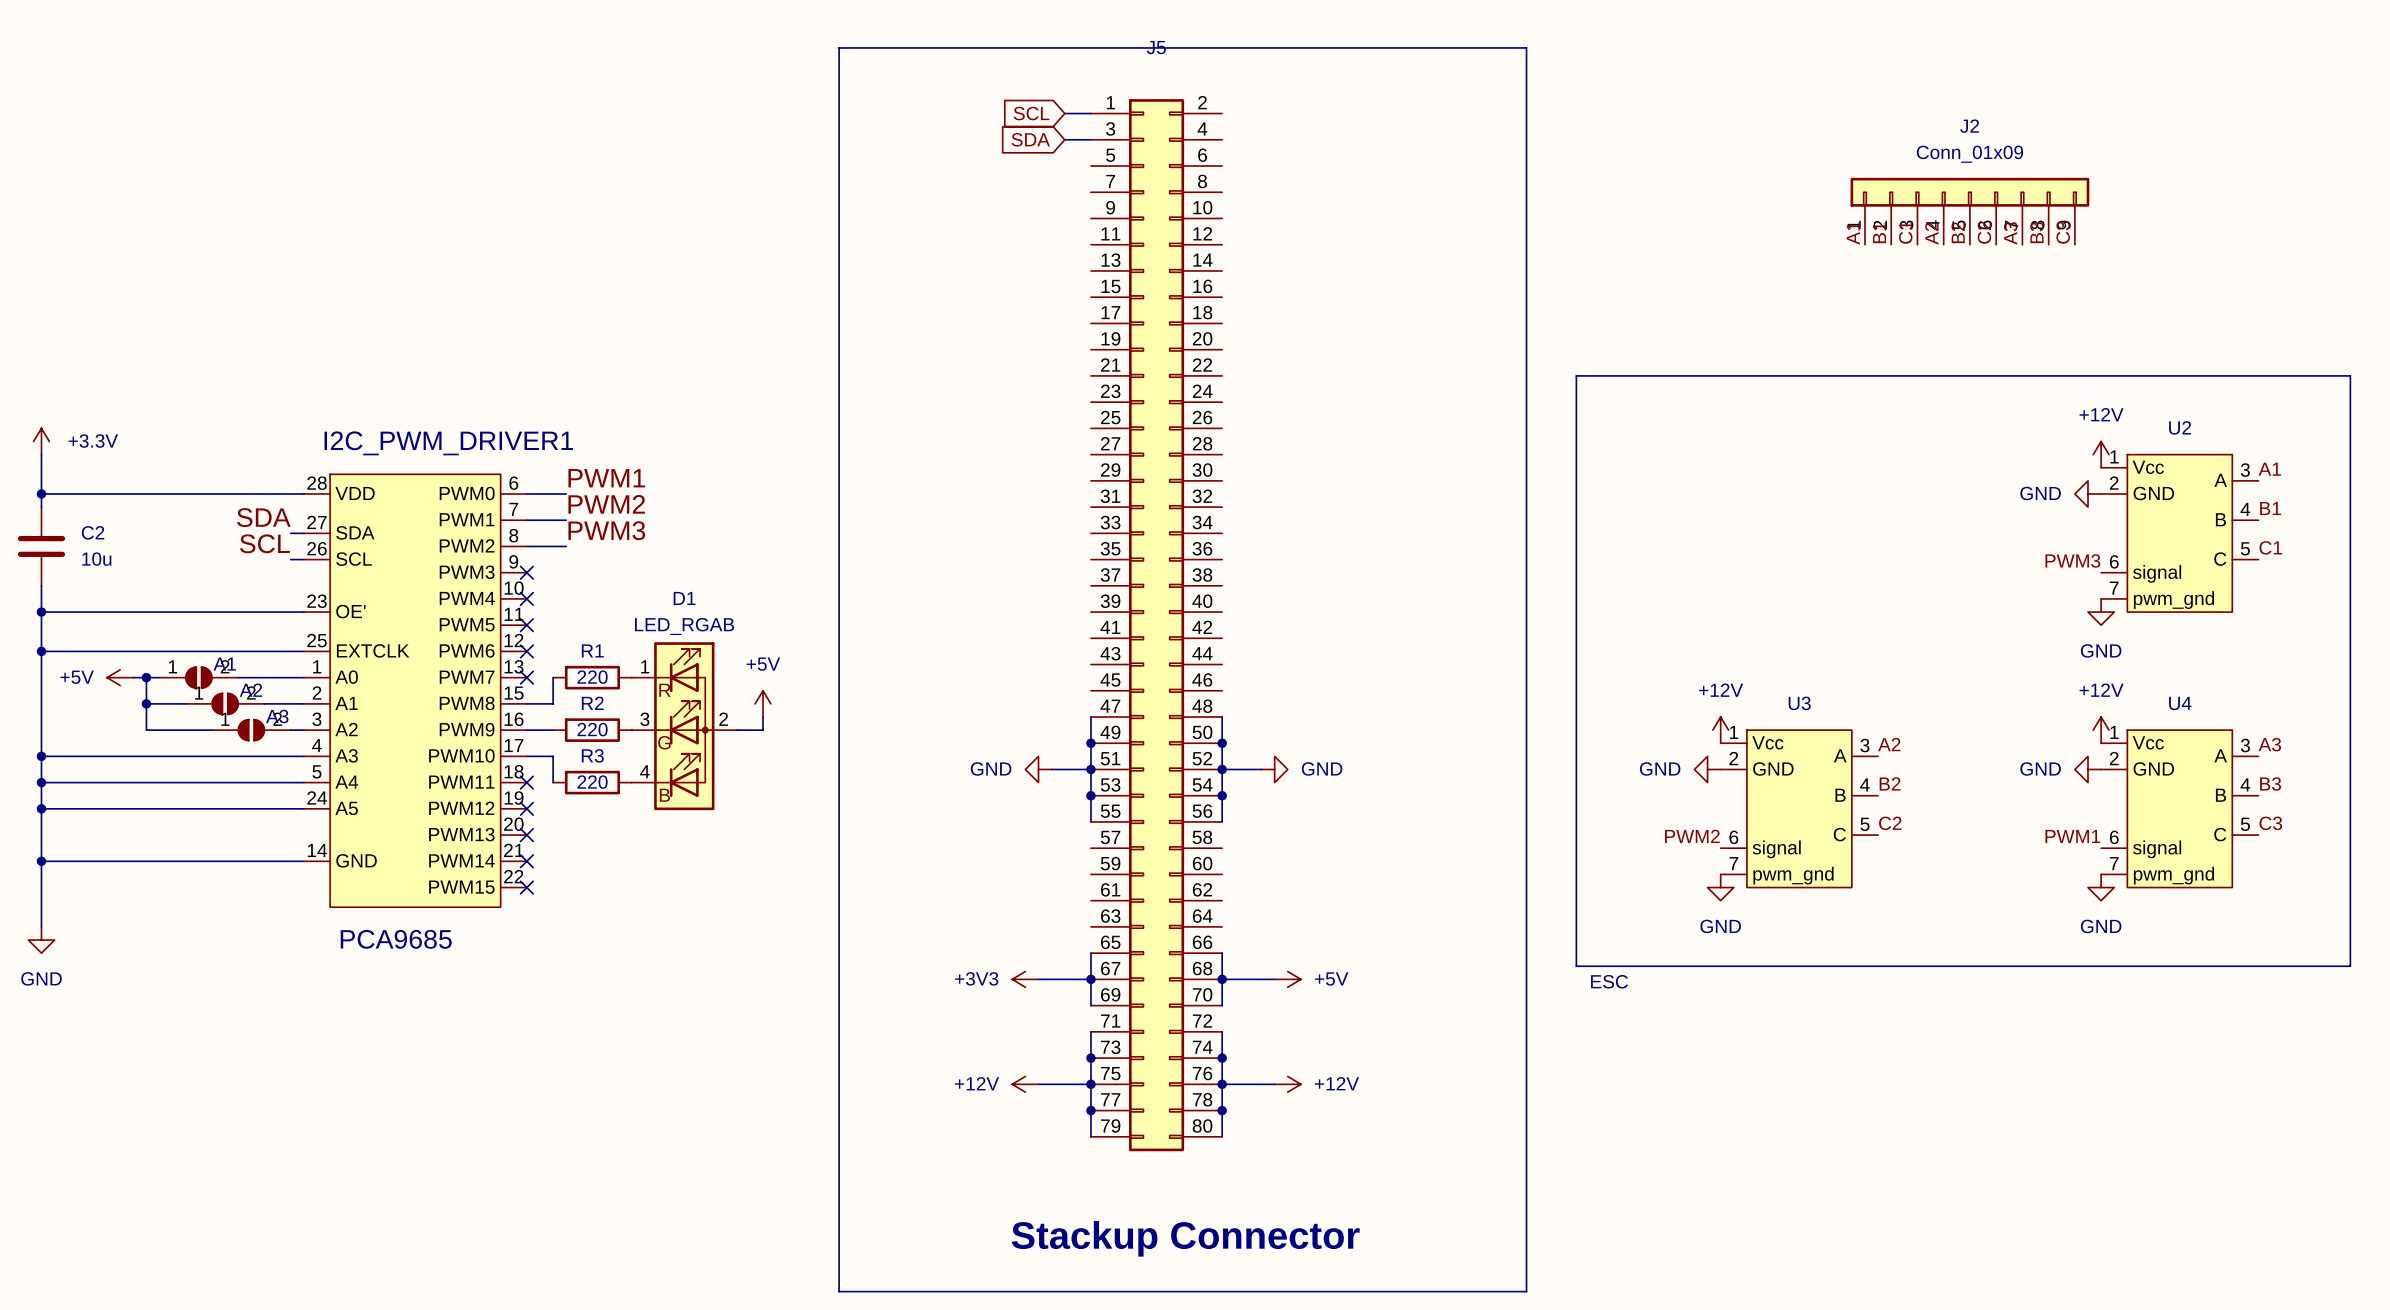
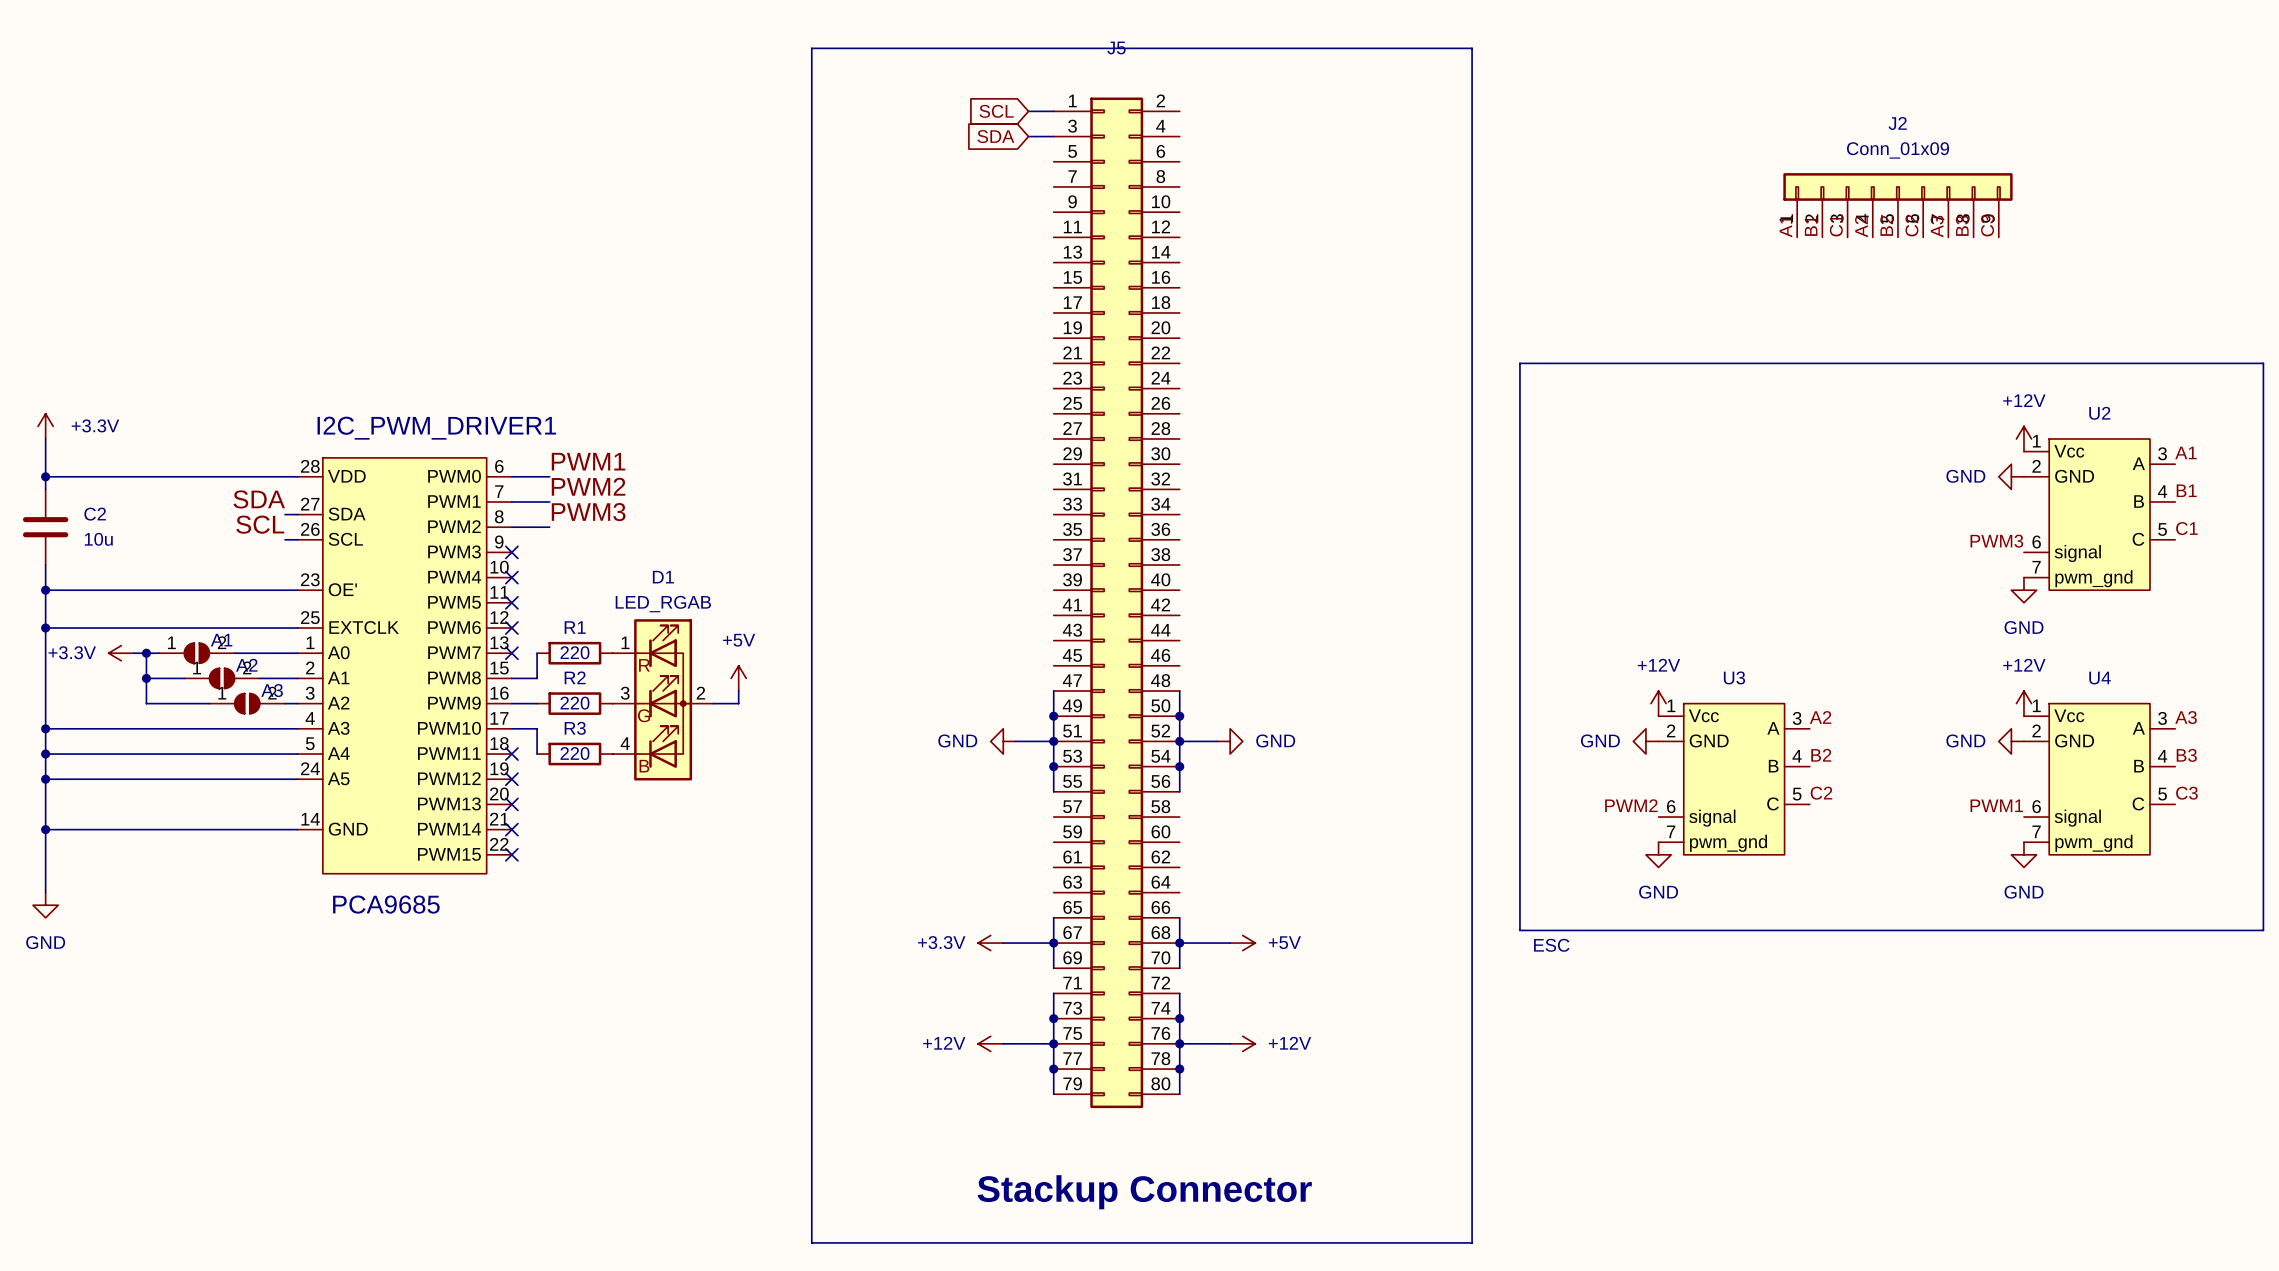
power symbol: +5V (120, 677) -> +3.3V (121, 653)
power symbol: +3V3 (1025, 979) -> +3.3V (990, 943)

